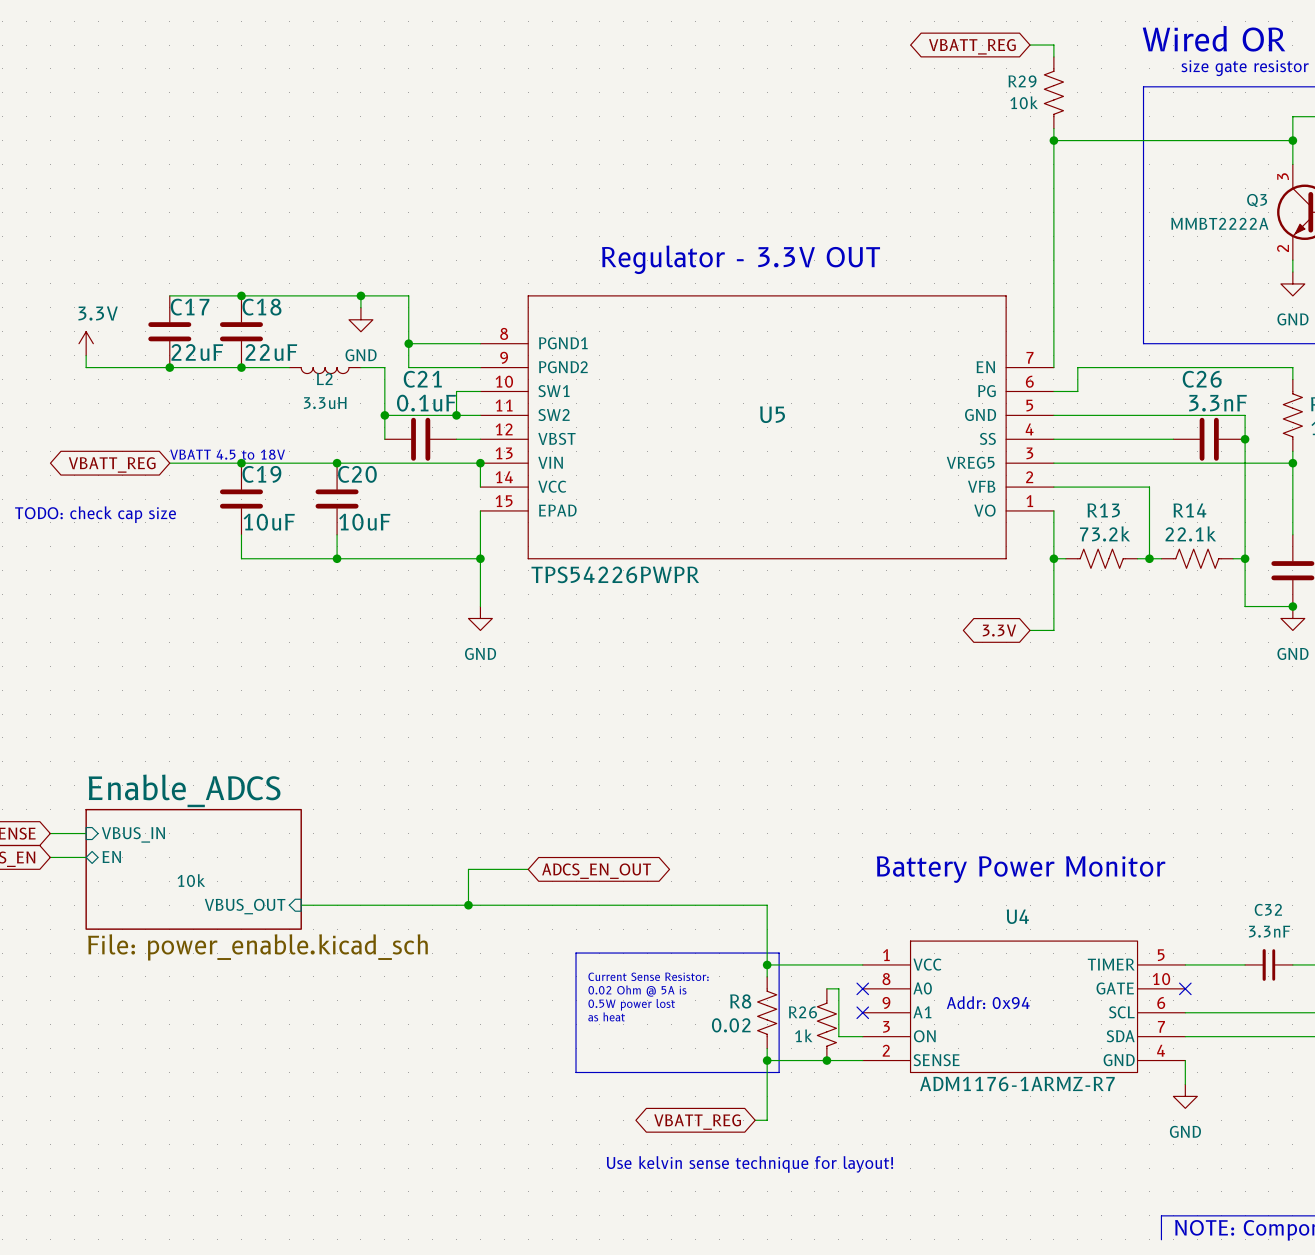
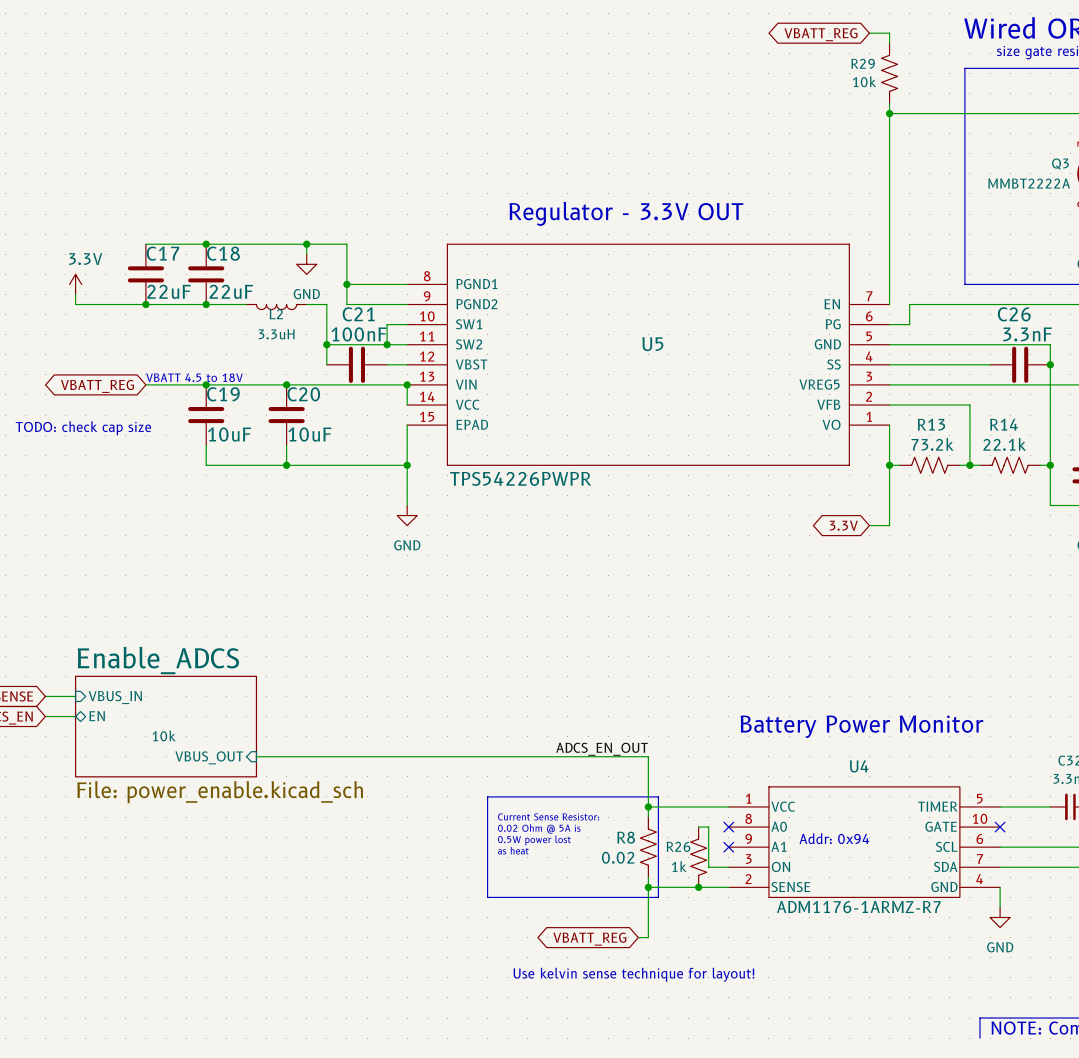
C21 value: 0.1uF (426, 403) -> 100nF (359, 334)
wire: (528, 869) (468, 869) (468, 905) -> none
global label: ADCS_EN_OUT (596, 871) -> none
label: none -> ADCS_EN_OUT (602, 749)
junction: (468, 905) -> none

